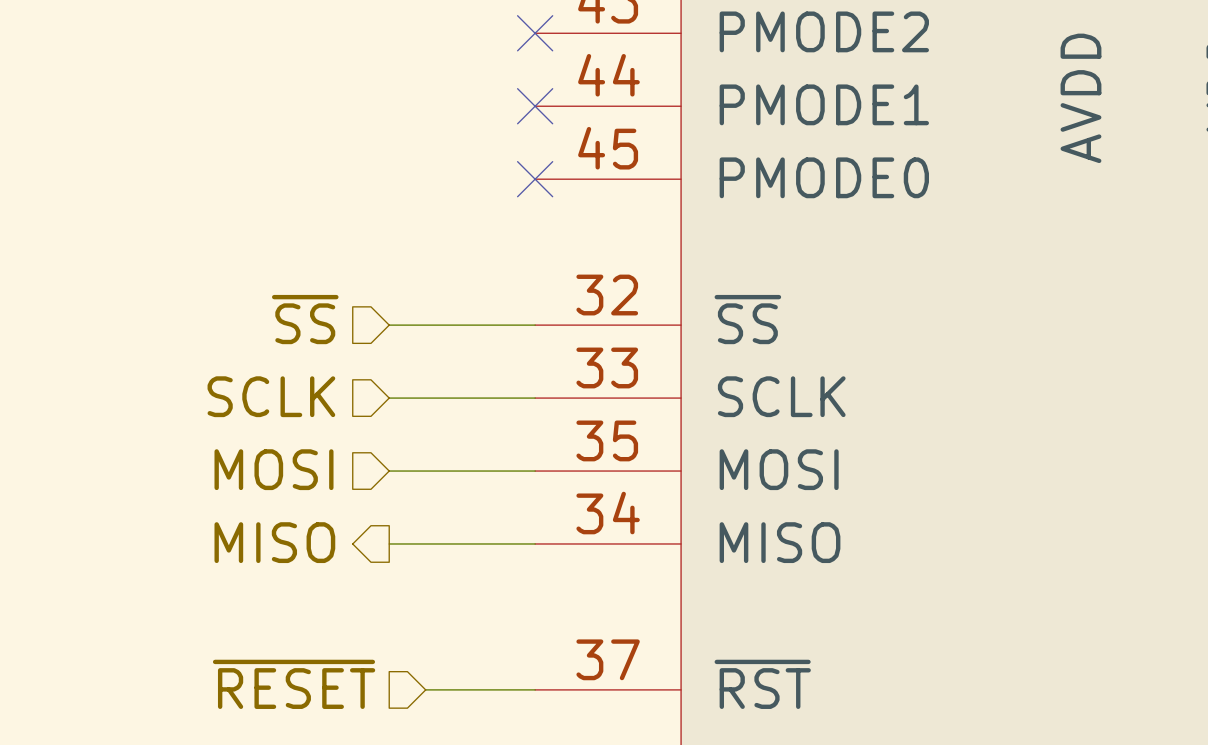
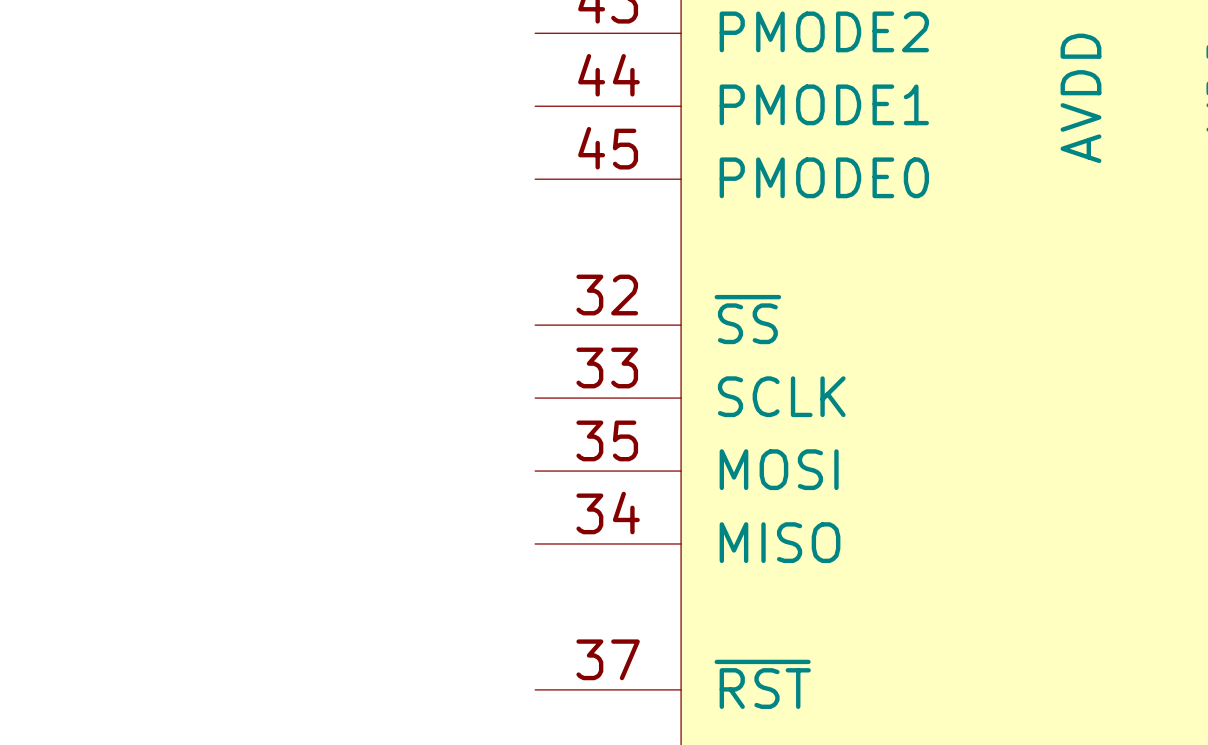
no-connect mark: (535, 33) -> none
no-connect mark: (535, 106) -> none
no-connect mark: (535, 179) -> none
hierarchical label: ~{SS} (305, 319) -> none
wire: (389, 325) (535, 325) -> none
hierarchical label: SCLK (271, 396) -> none
wire: (389, 398) (535, 398) -> none
hierarchical label: MOSI (274, 469) -> none
wire: (389, 471) (535, 471) -> none
hierarchical label: MISO (274, 542) -> none
wire: (389, 543) (535, 543) -> none
hierarchical label: ~{RESET} (294, 684) -> none
wire: (425, 689) (535, 689) -> none

